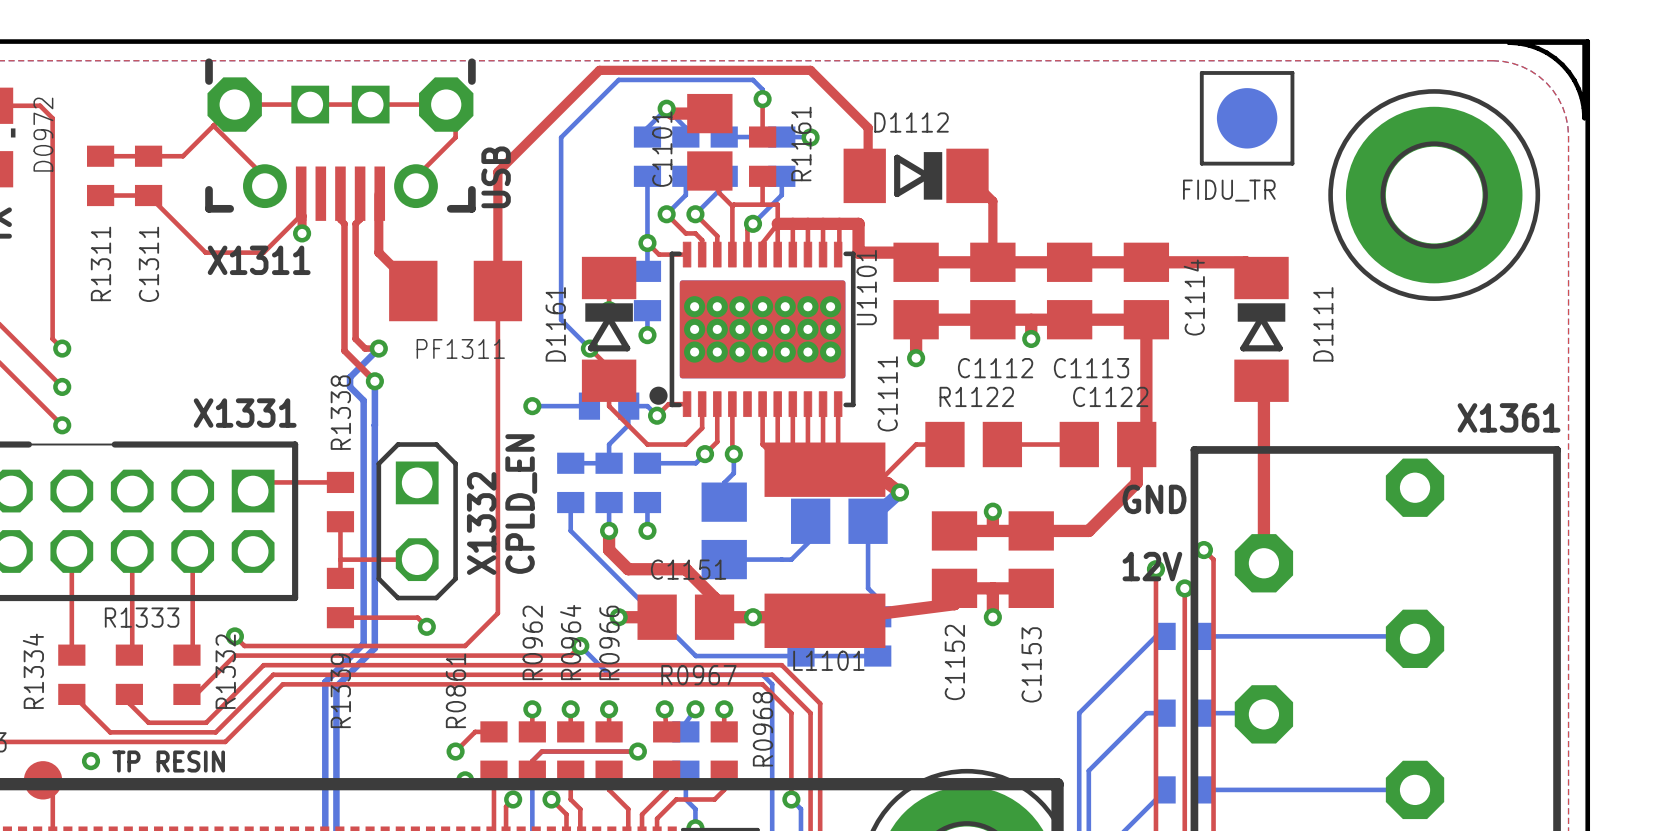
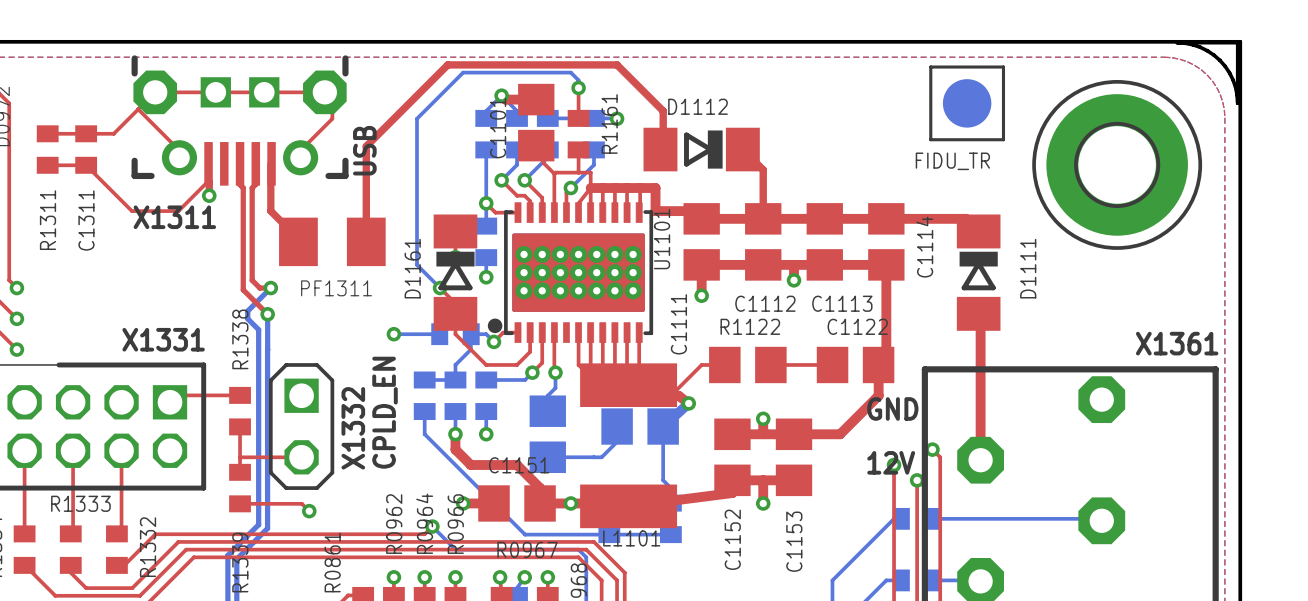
top track: (497, 291) (497, 613) (465, 645) (244, 645) (234, 636) -> none
via: (234, 636) -> none

